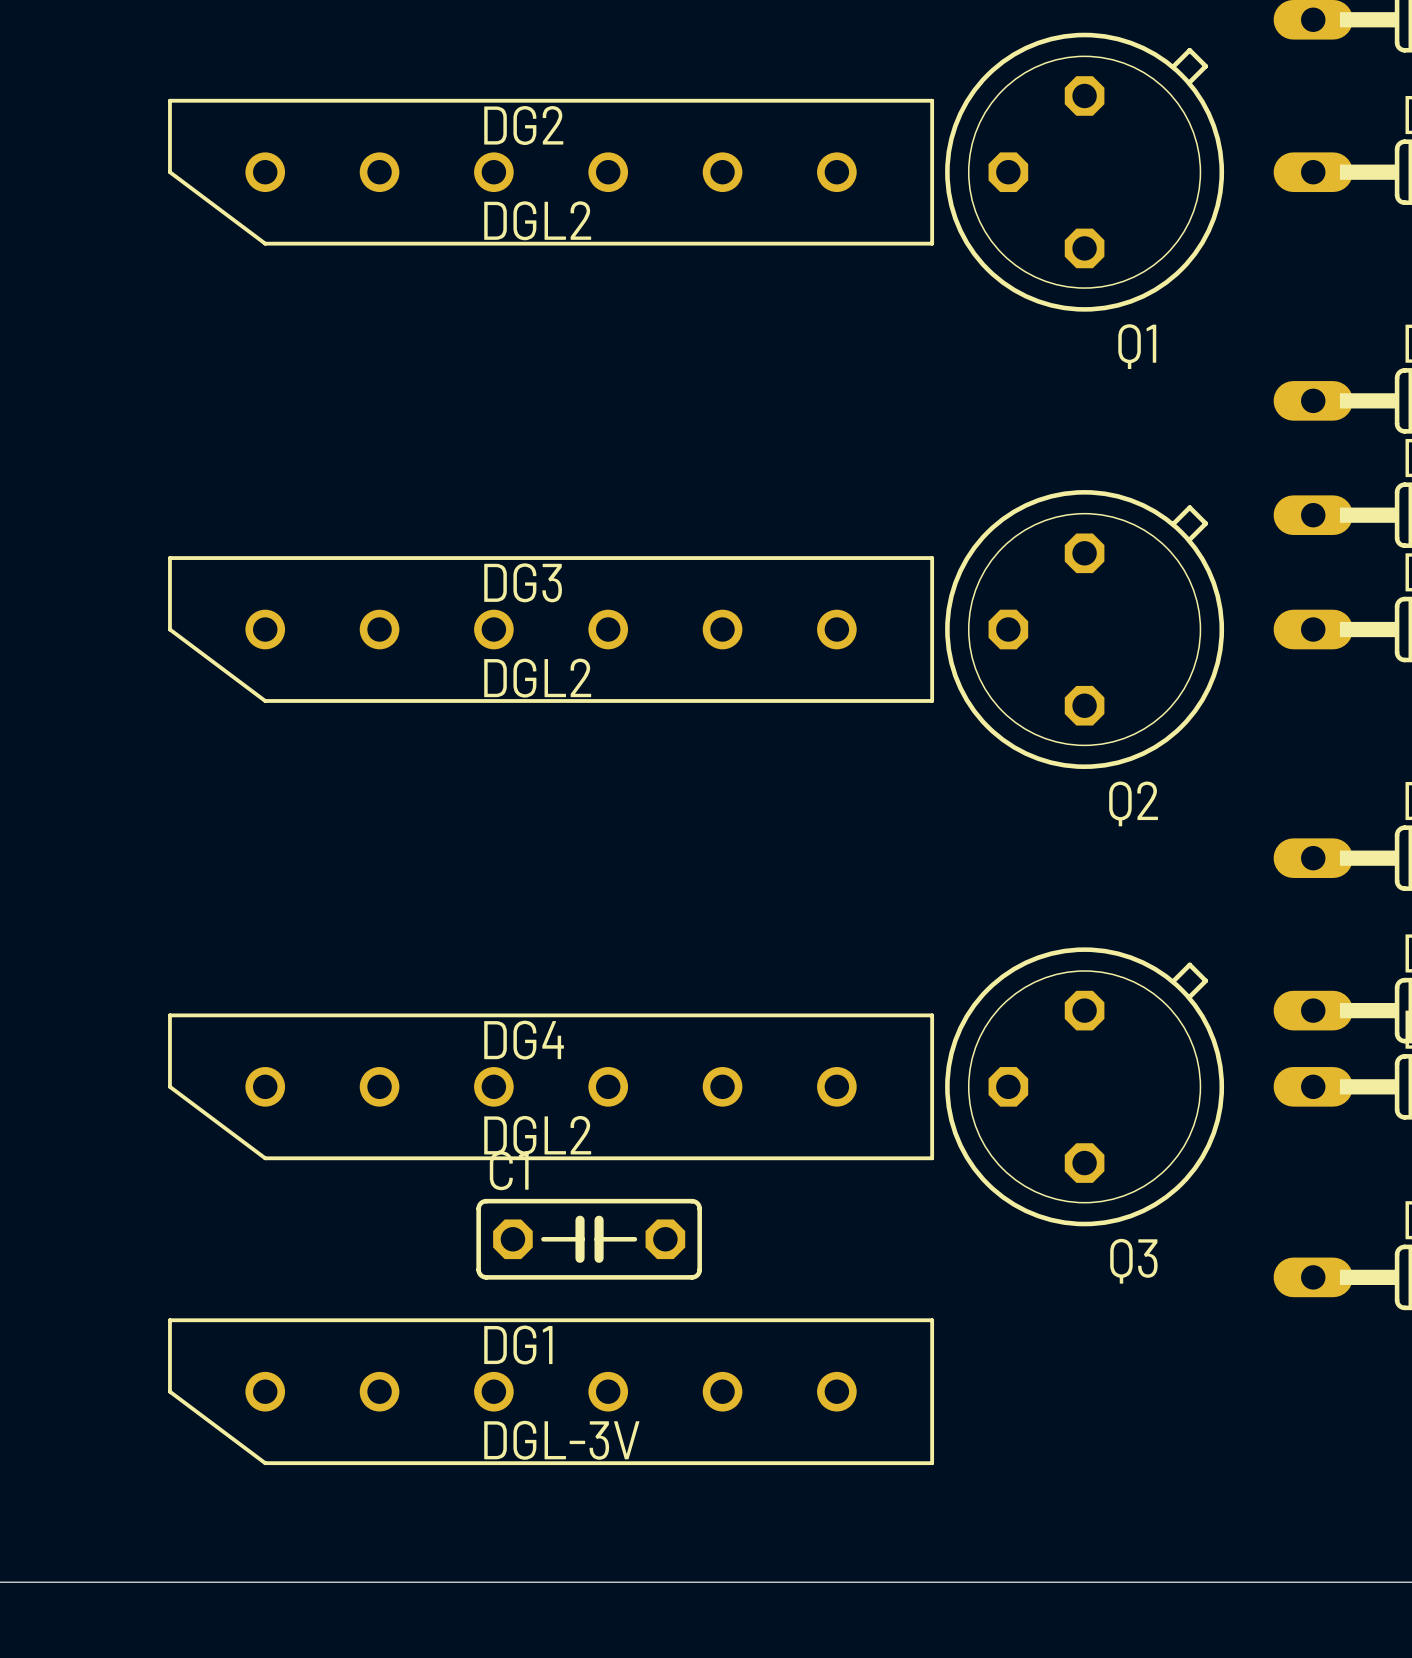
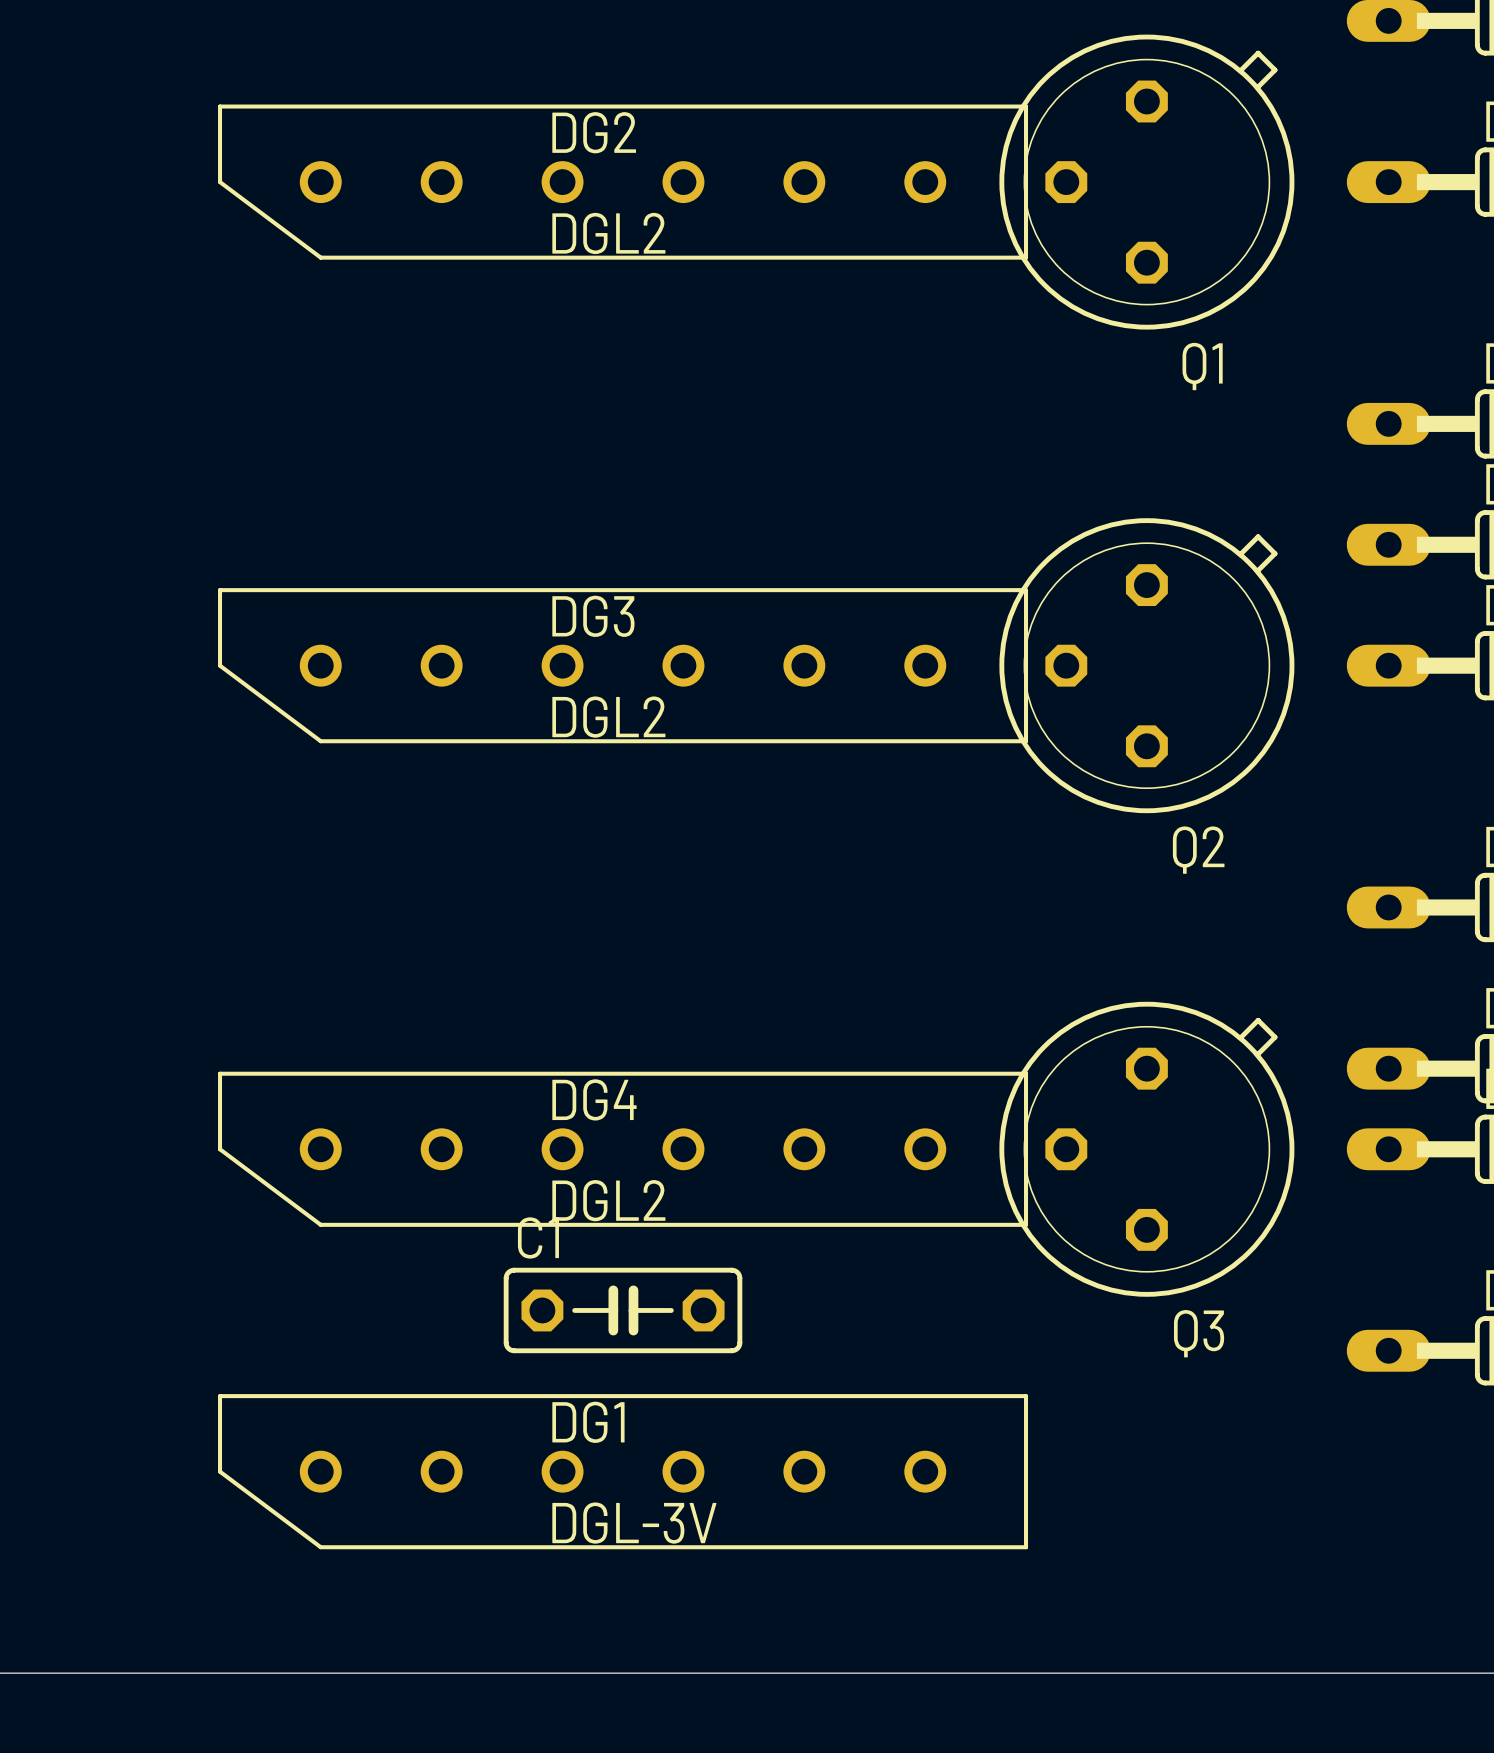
DG2 position: (551, 172) -> (623, 182)
DG3 position: (551, 629) -> (623, 665)
DG4 position: (551, 1086) -> (623, 1149)
DG1 position: (551, 1391) -> (623, 1471)

